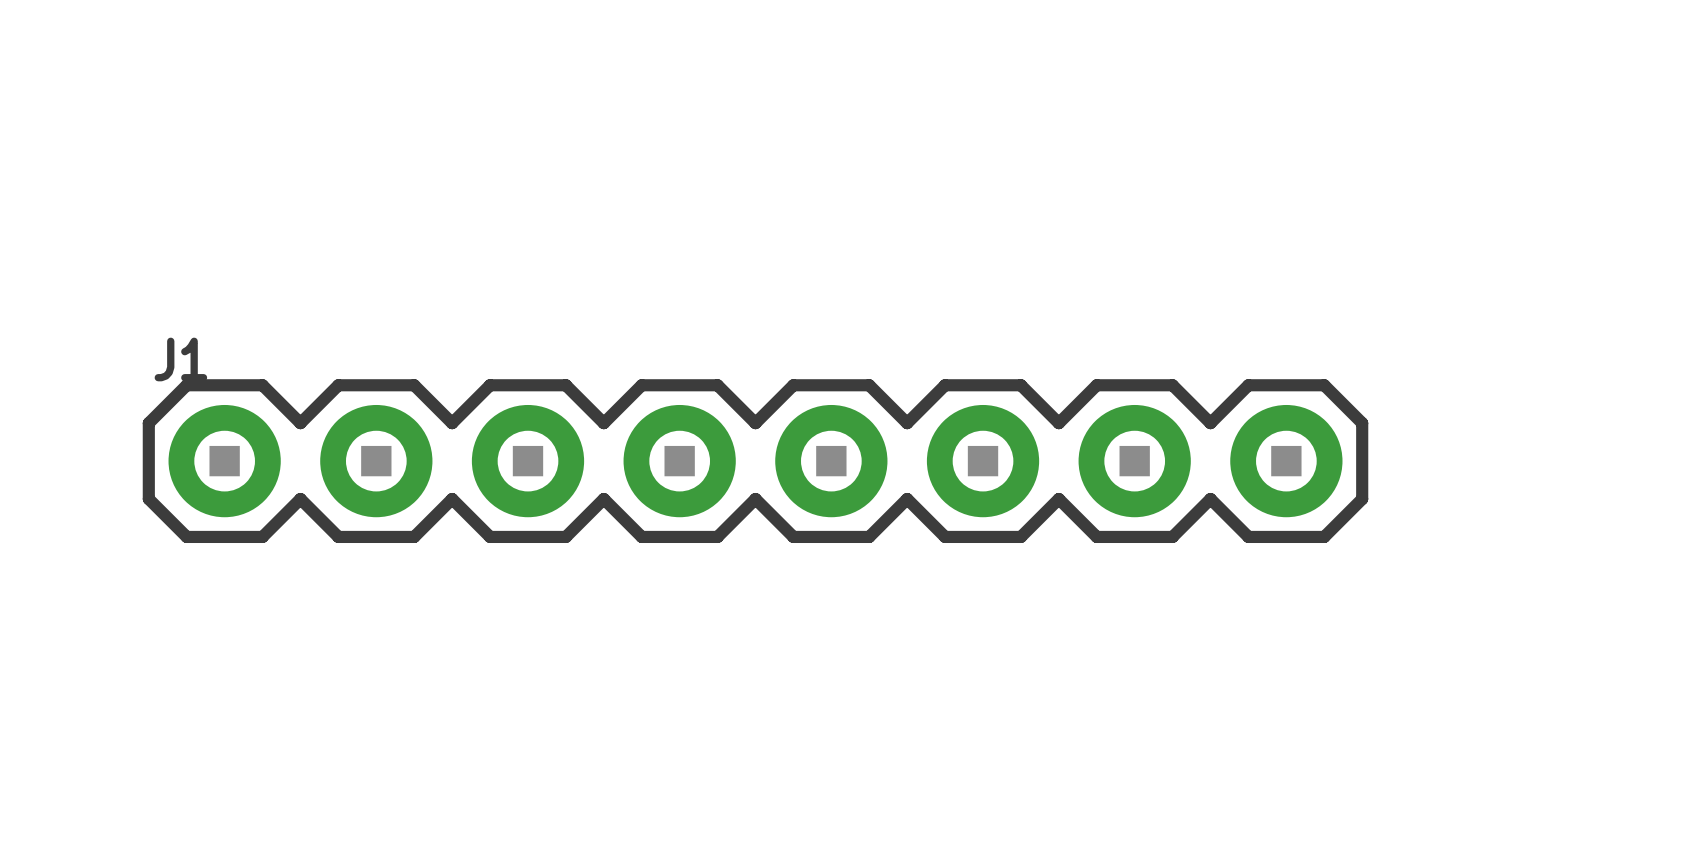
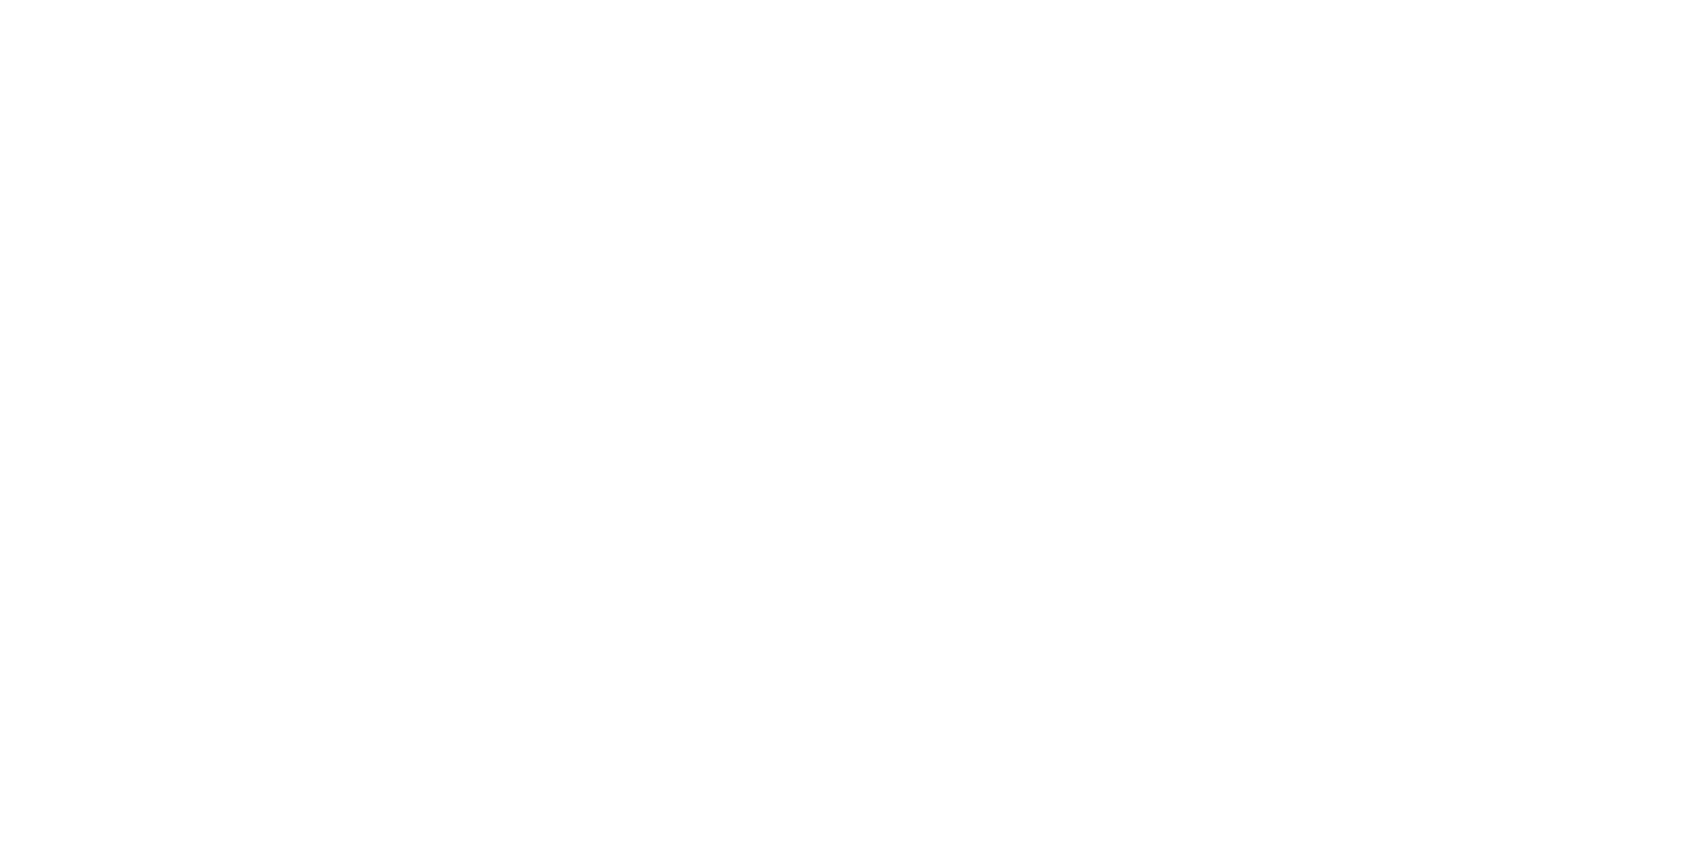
J1: (755, 461) -> none

